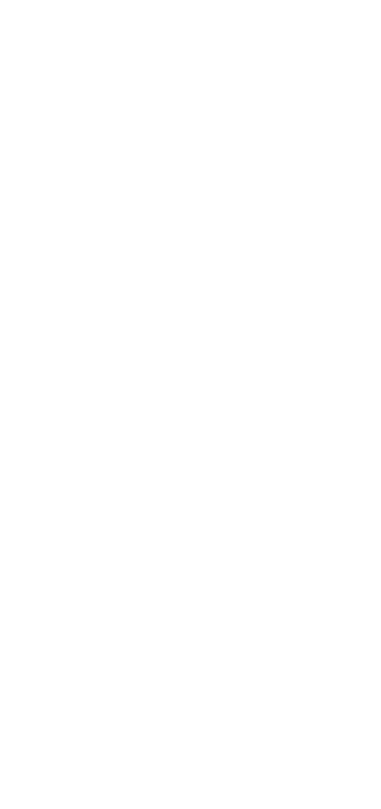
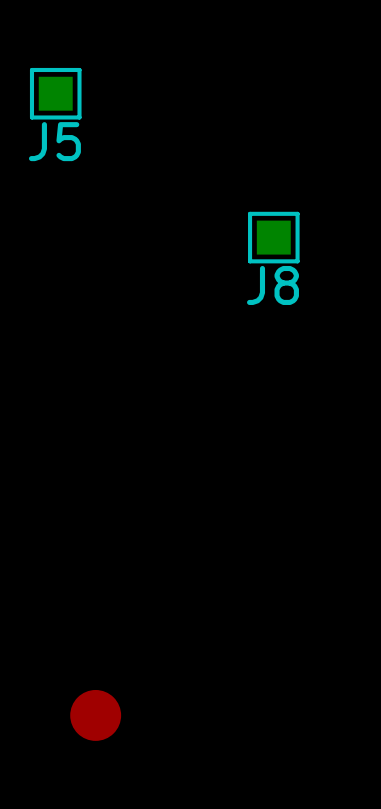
J5: none -> (55, 93)
J8: none -> (273, 237)
part: none -> (95, 715)

